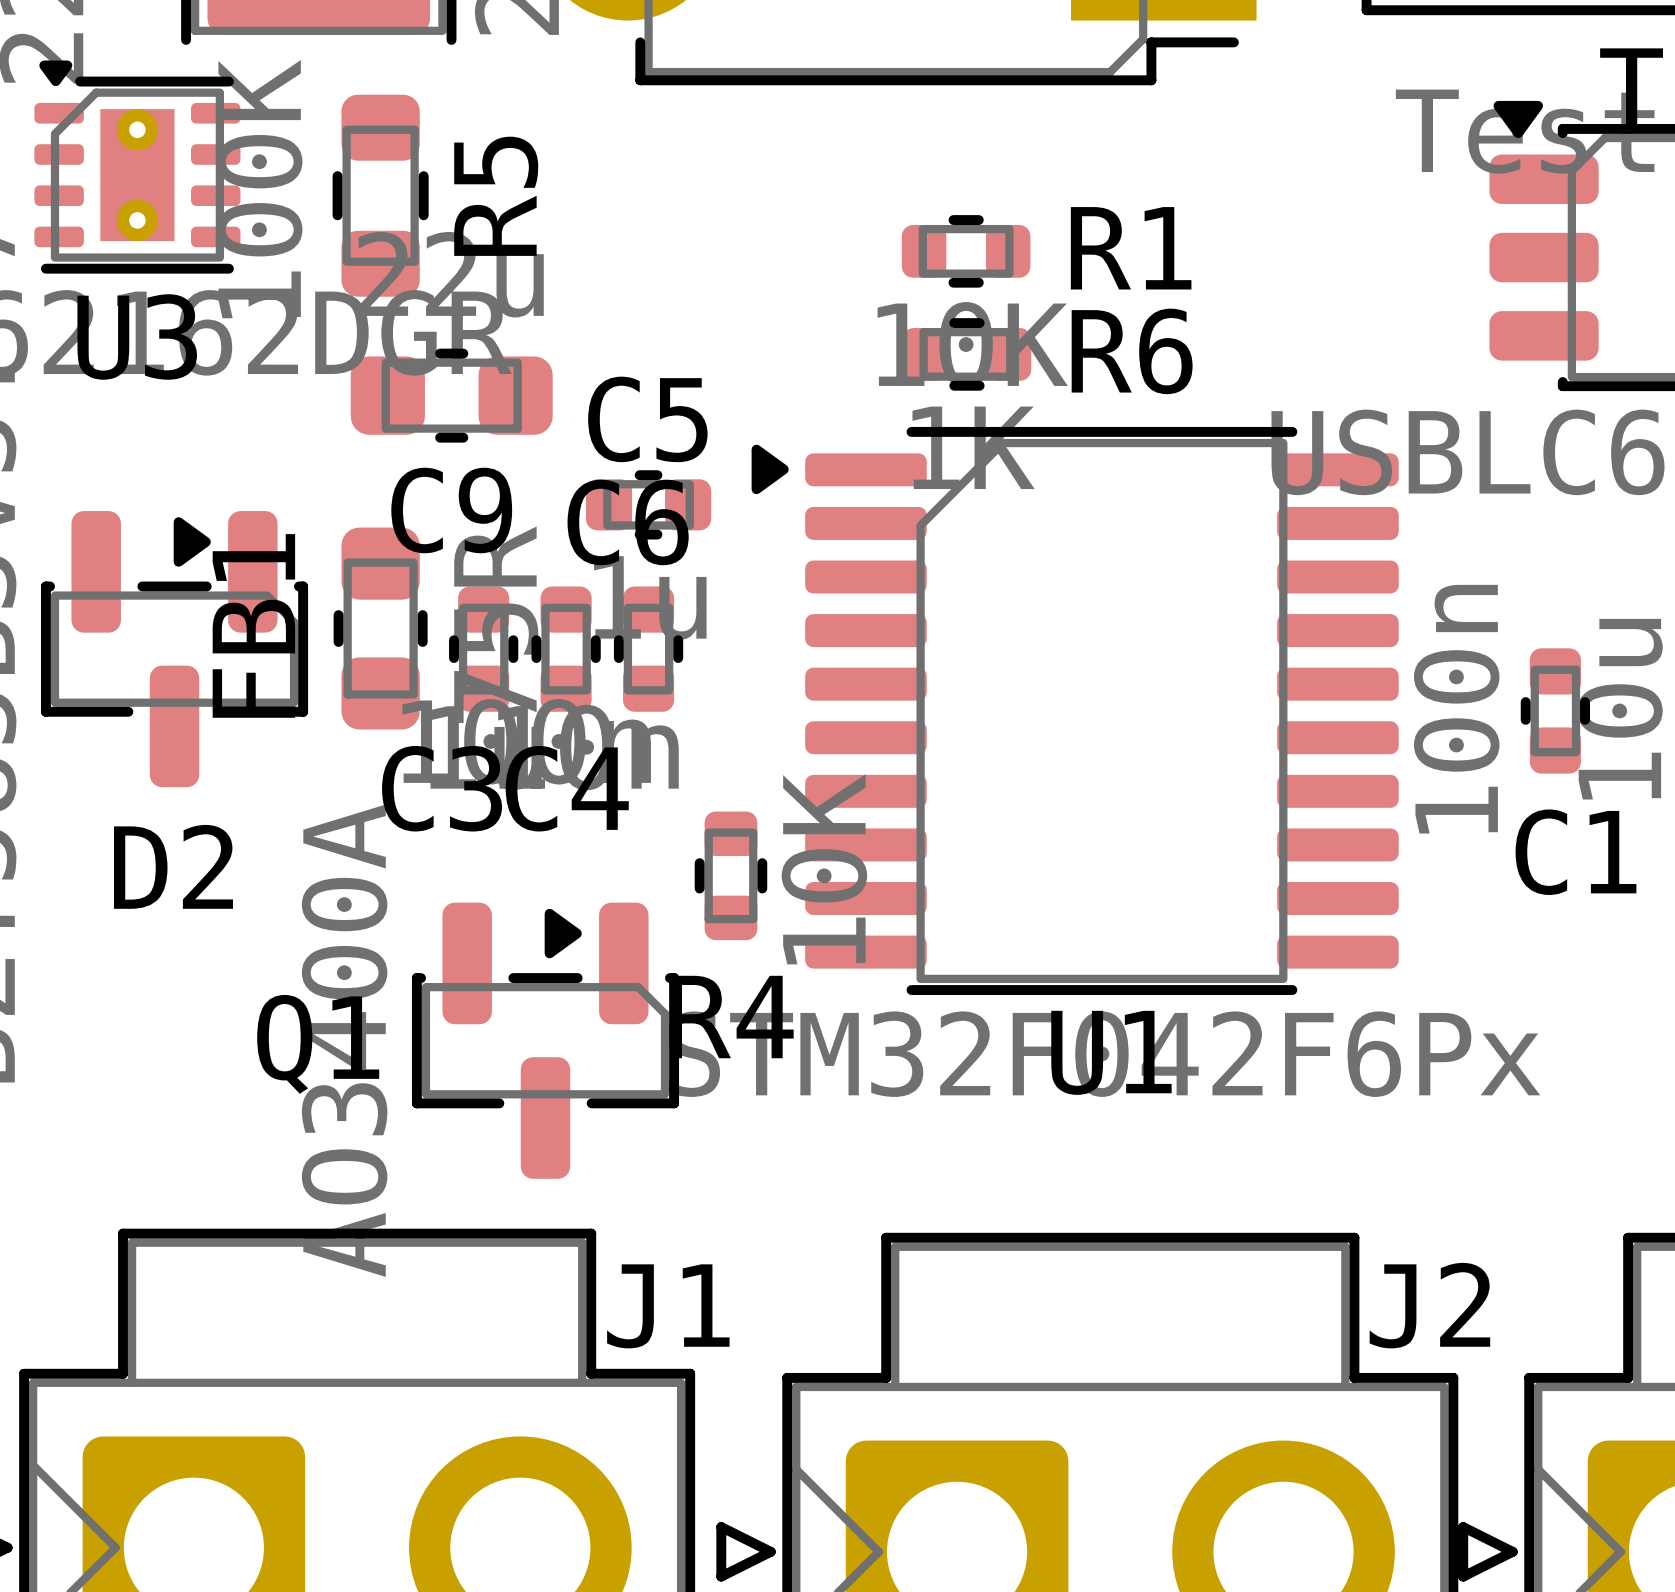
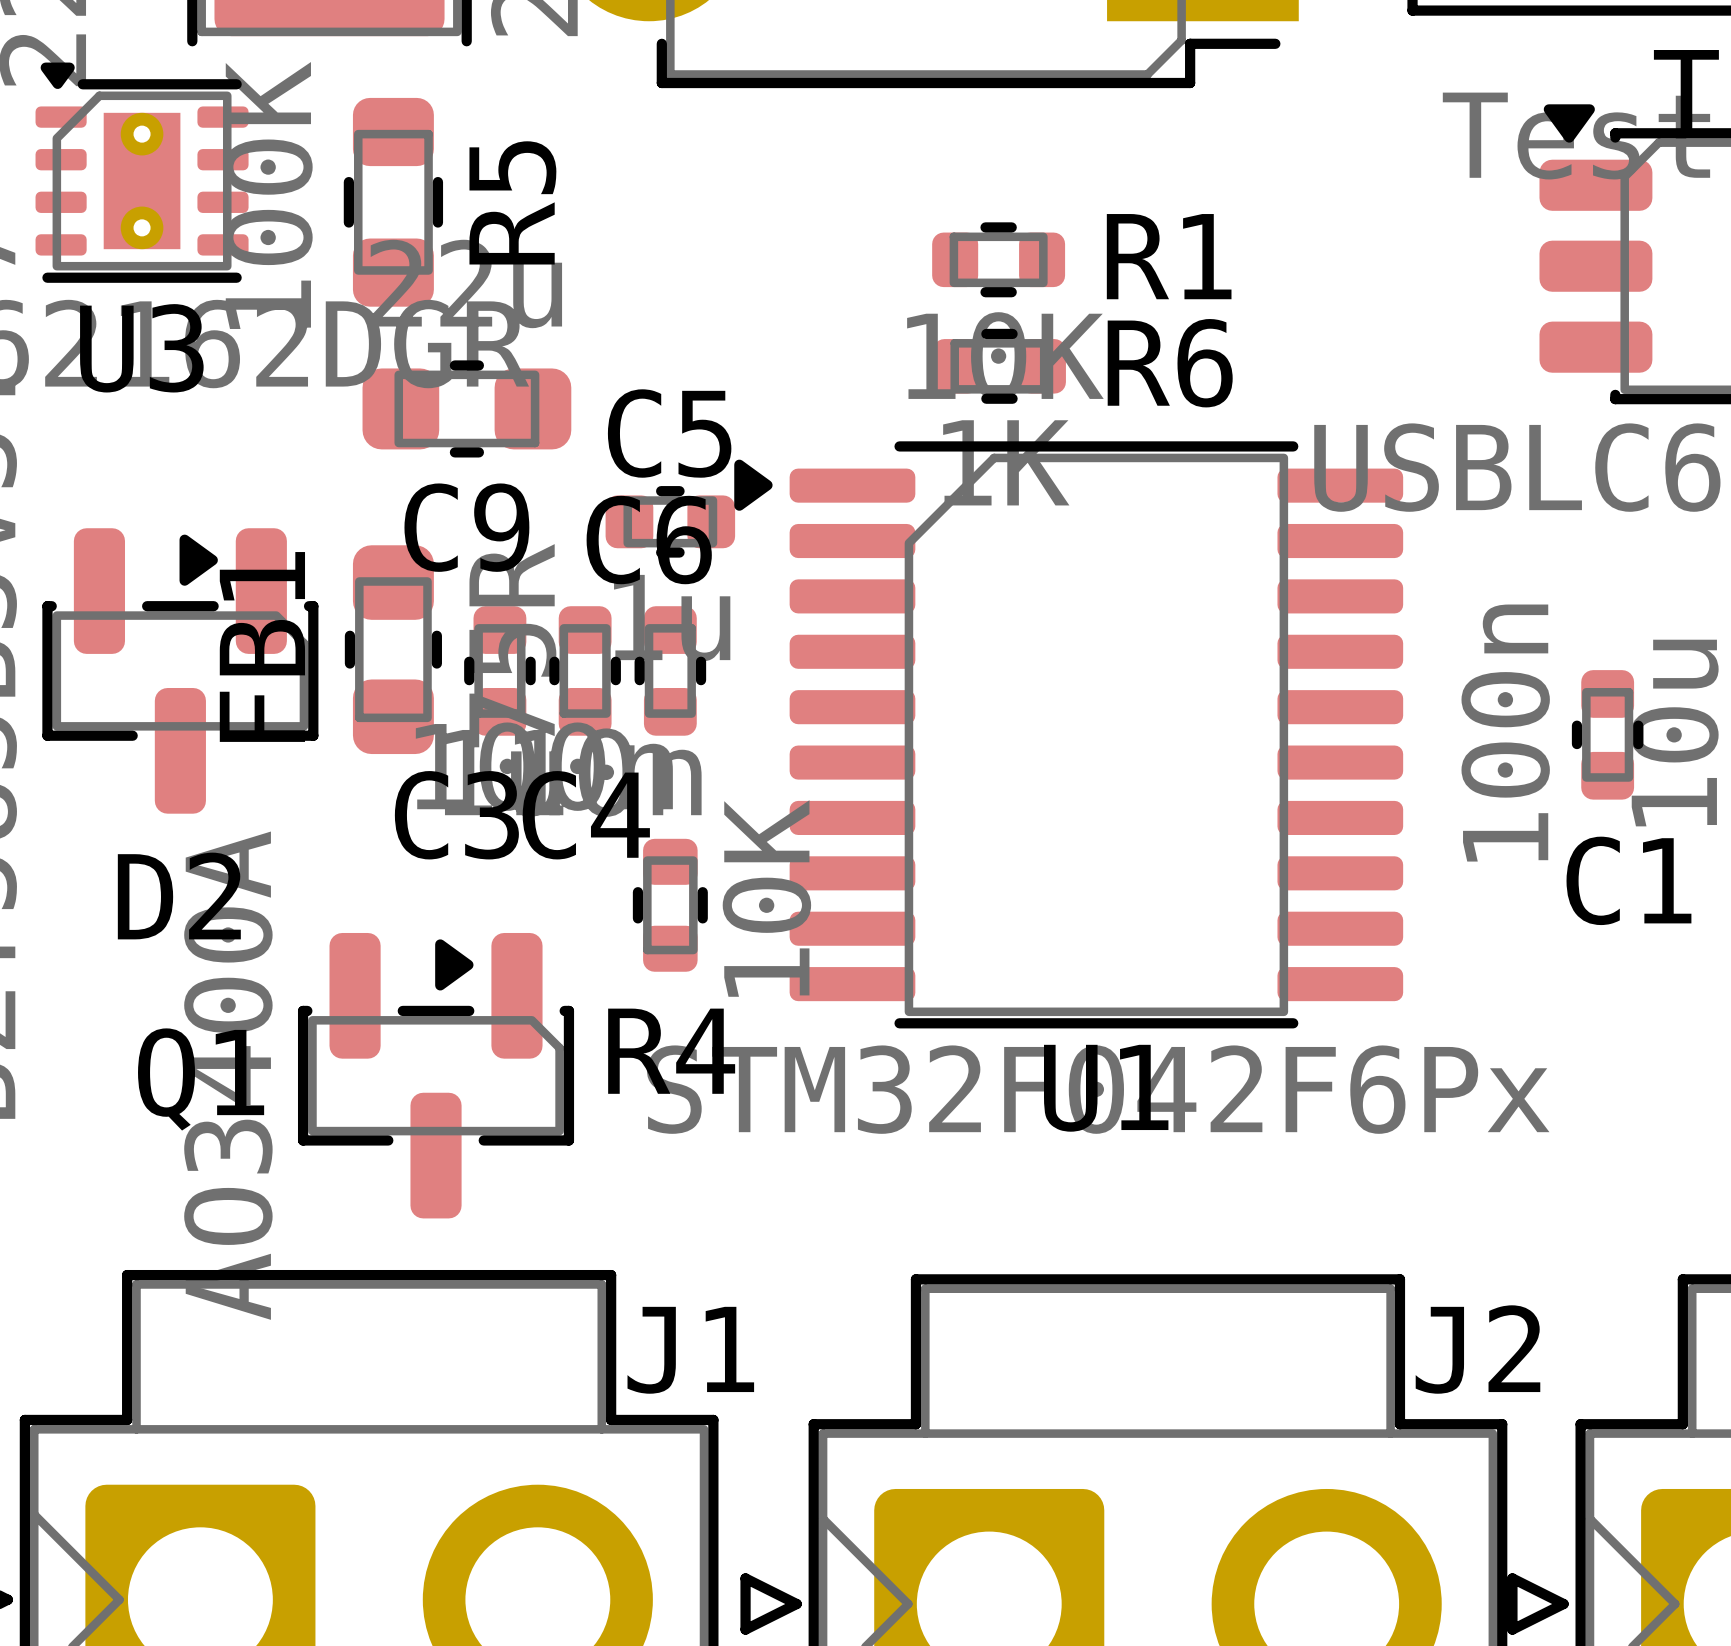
U1 position: (1075, 710) -> (1068, 734)
R4 position: (730, 875) -> (670, 905)
Q1 position: (545, 1040) -> (436, 1075)

